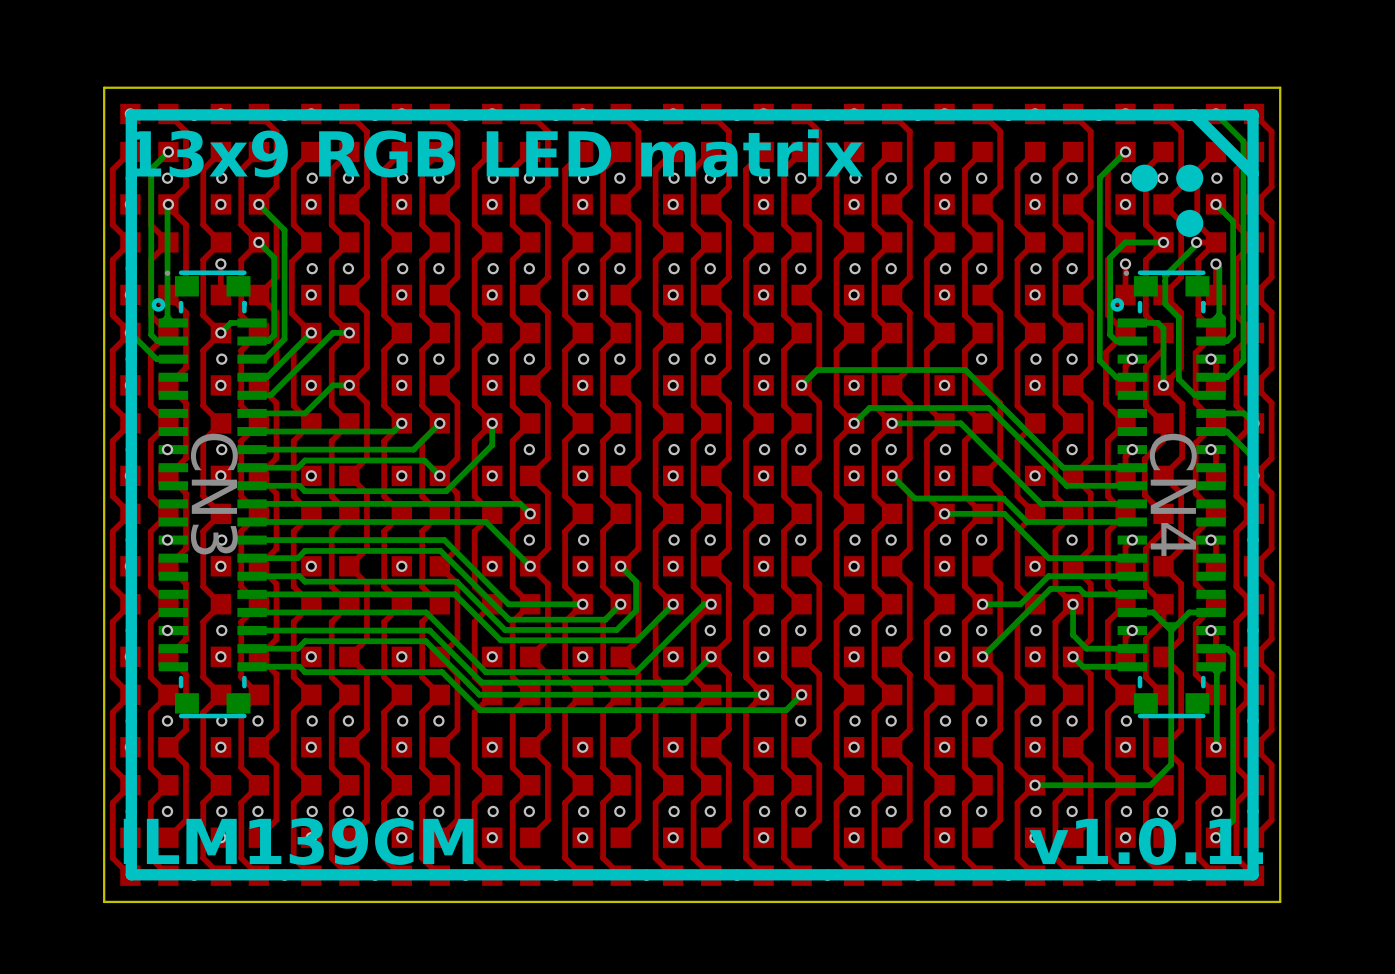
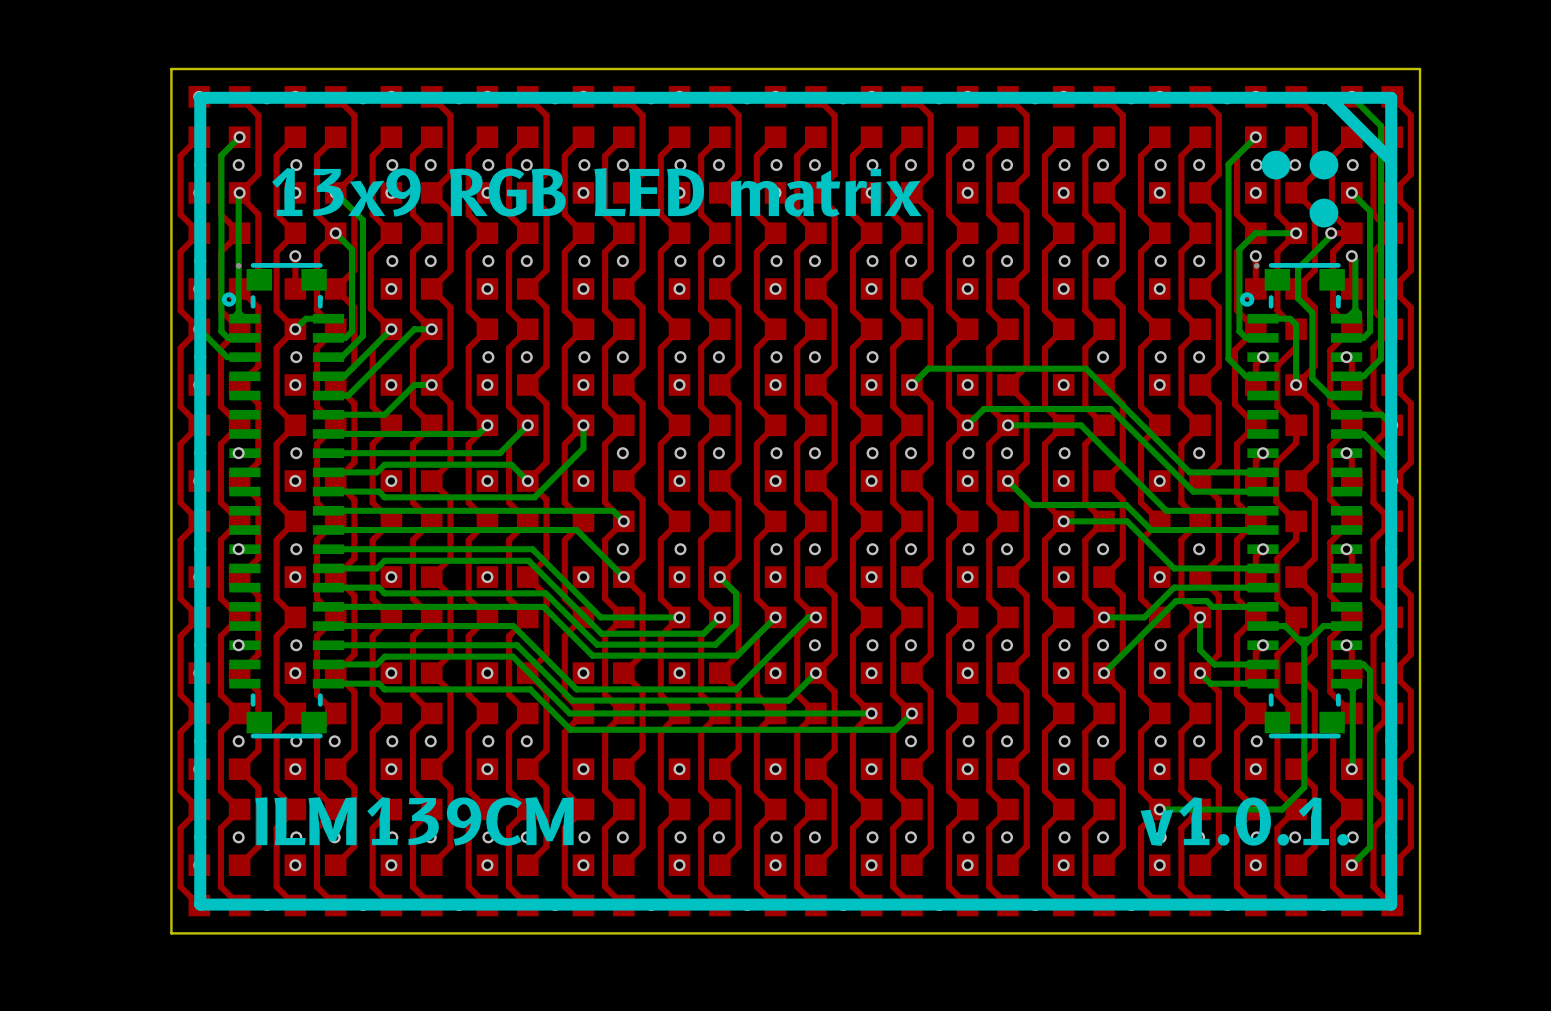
text position: 13x9 RGB LED matrix (496, 153) -> 13x9 RGB LED matrix (596, 192)
CN3 name: CN3 (214, 494) -> none
CN4 name: CN4 (1173, 494) -> none
text position: ILM139CM (298, 841) -> ILM139CM (414, 821)
text position: v1.0.1. (1146, 841) -> v1.0.1. (1244, 821)

